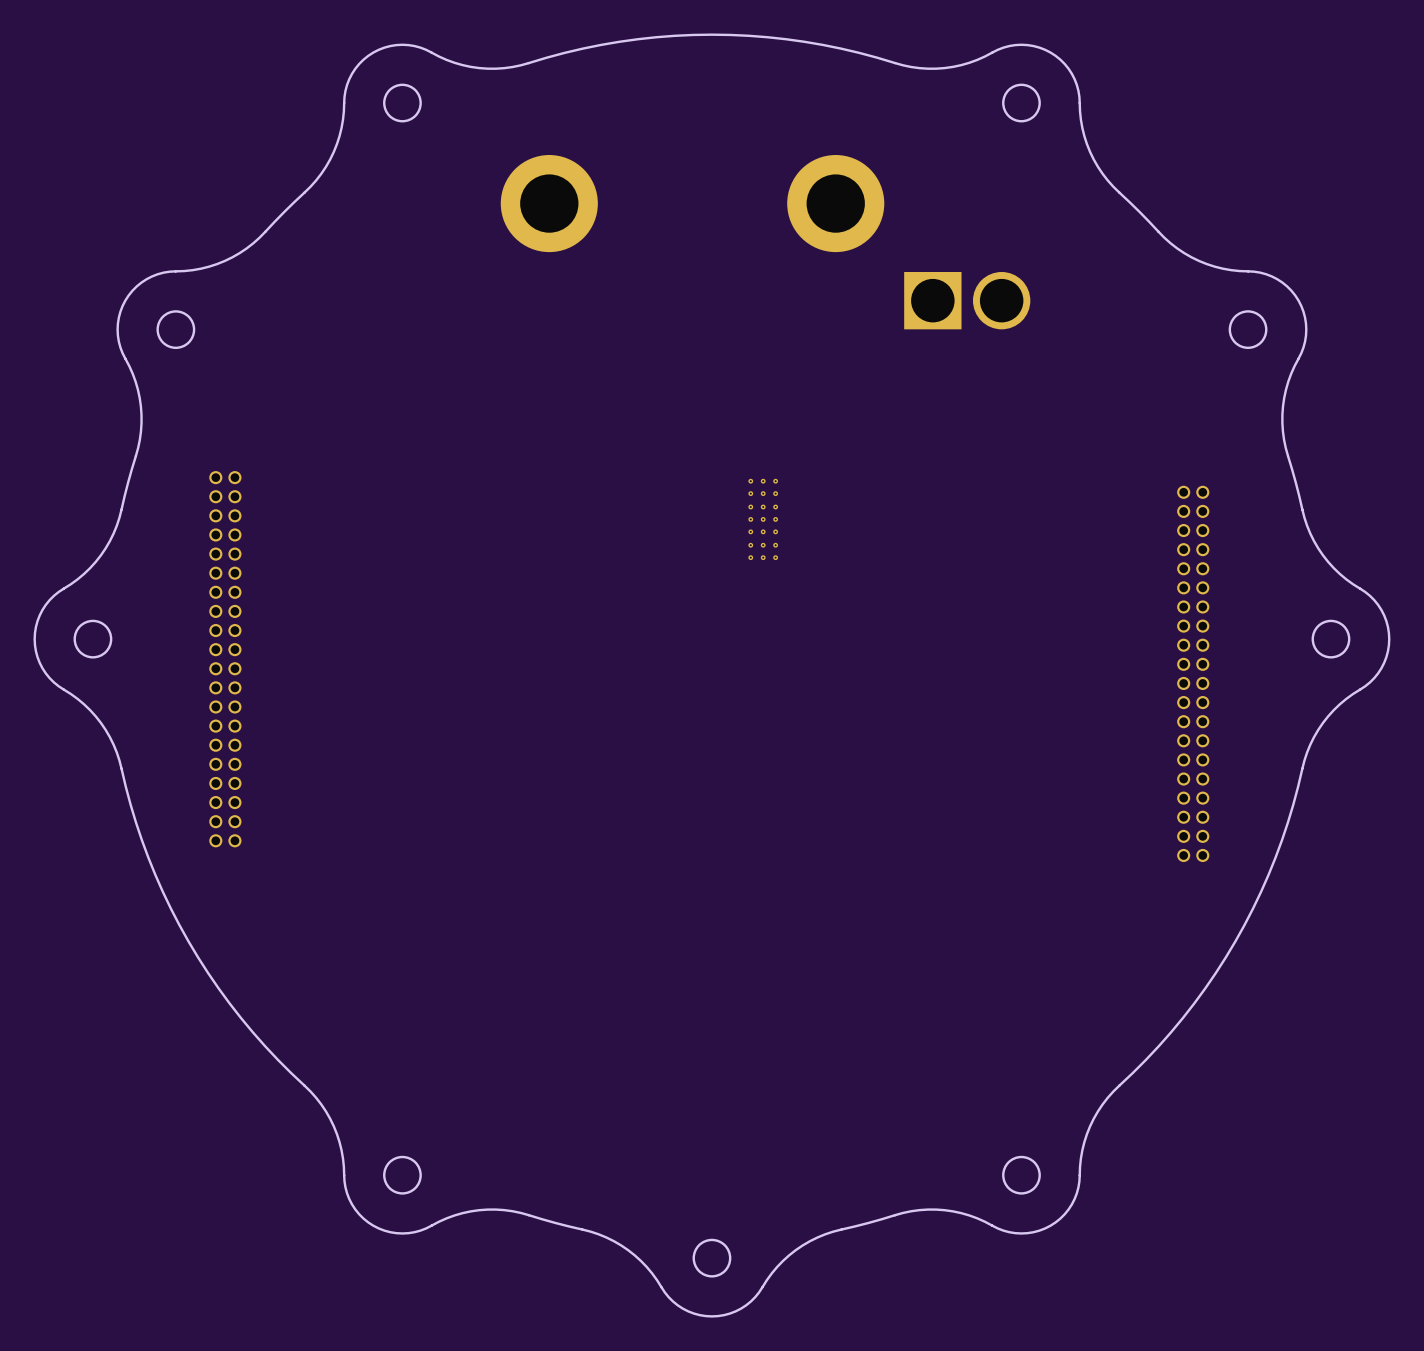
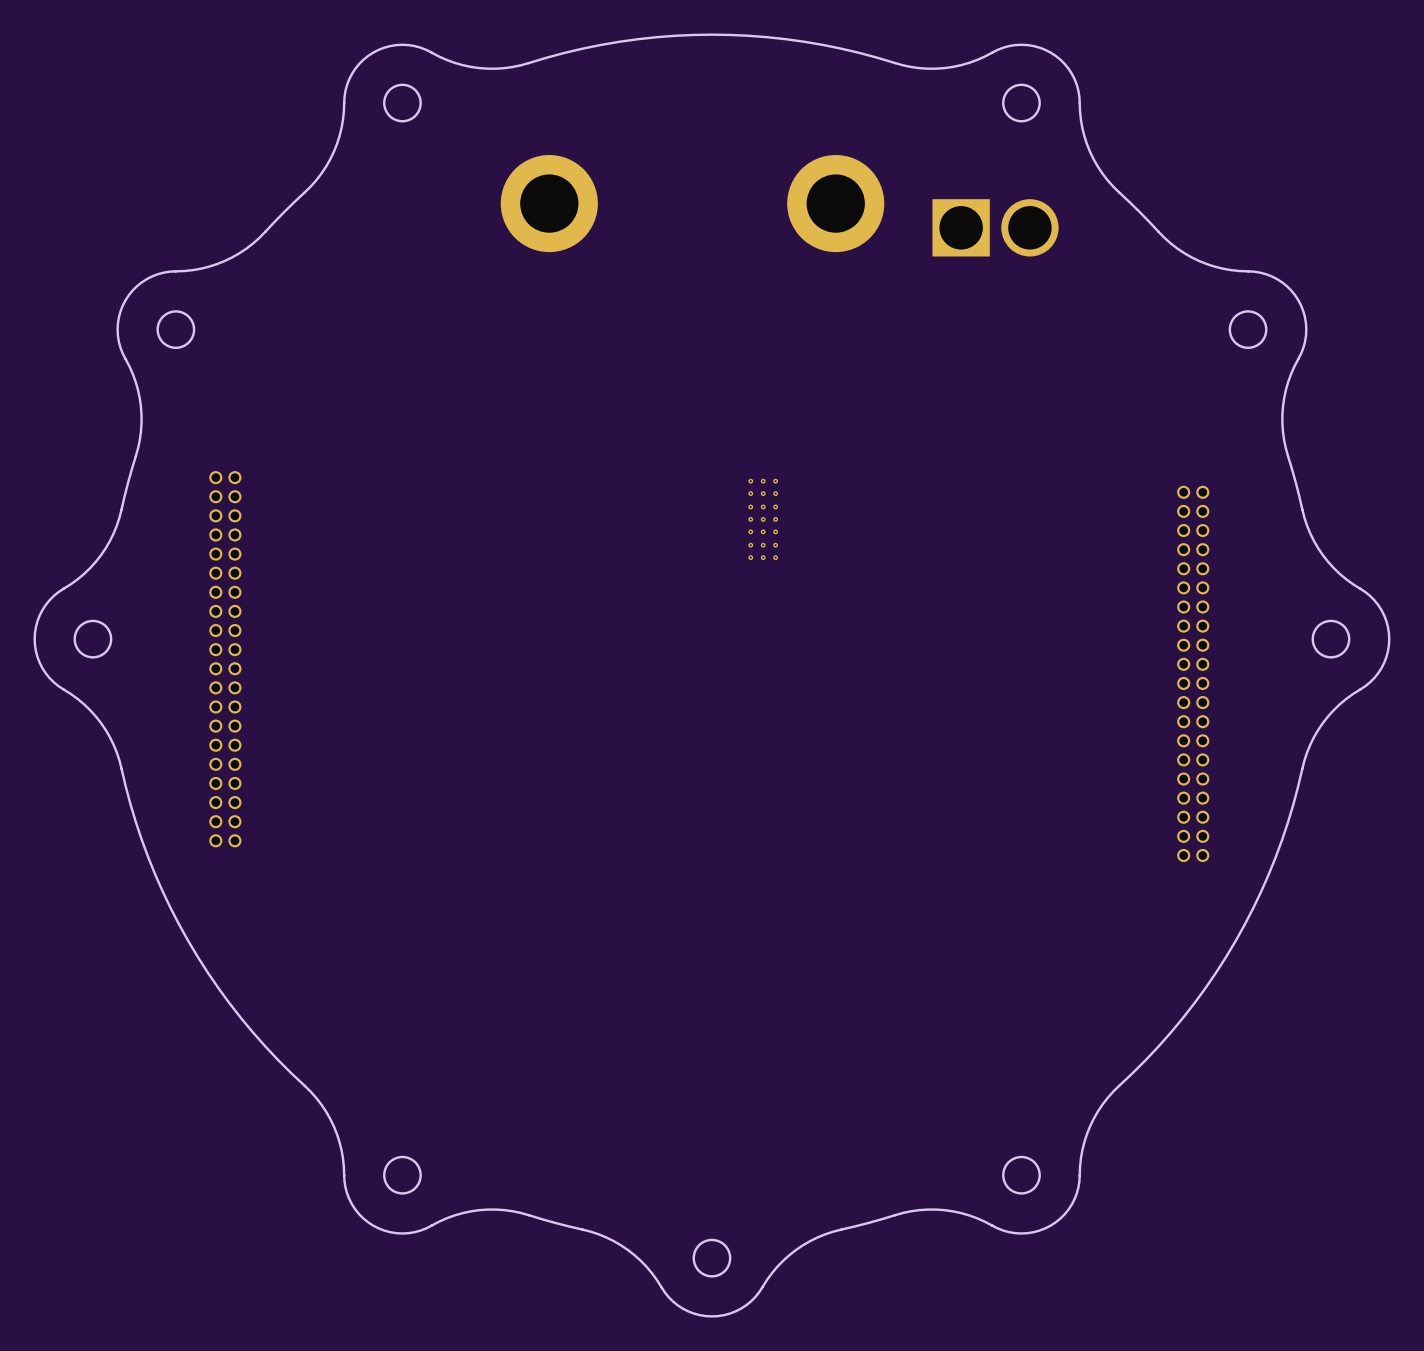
part position: (967, 300) -> (995, 227)

